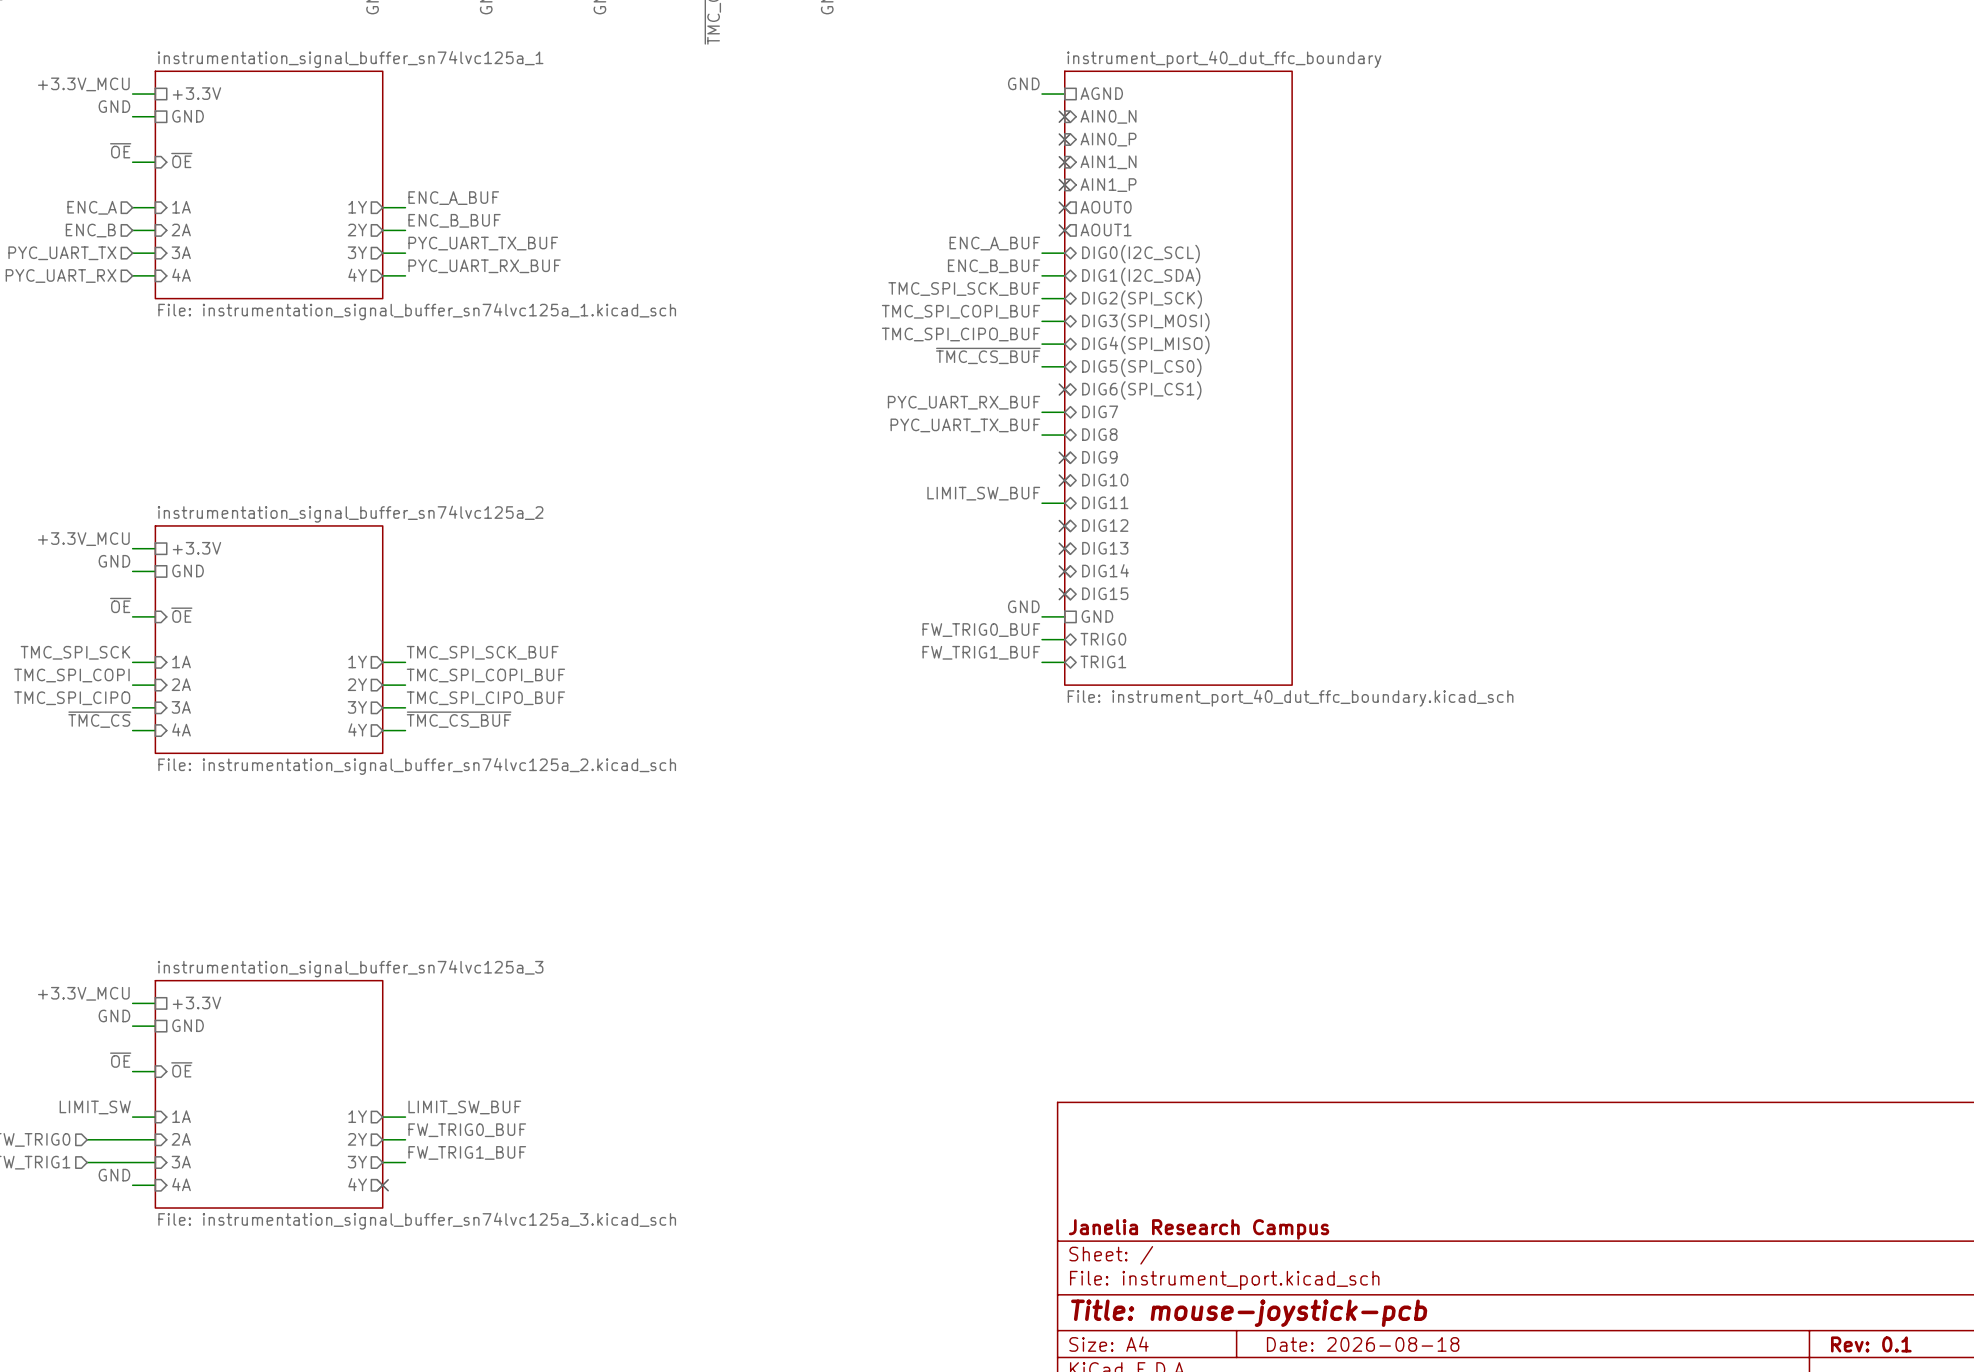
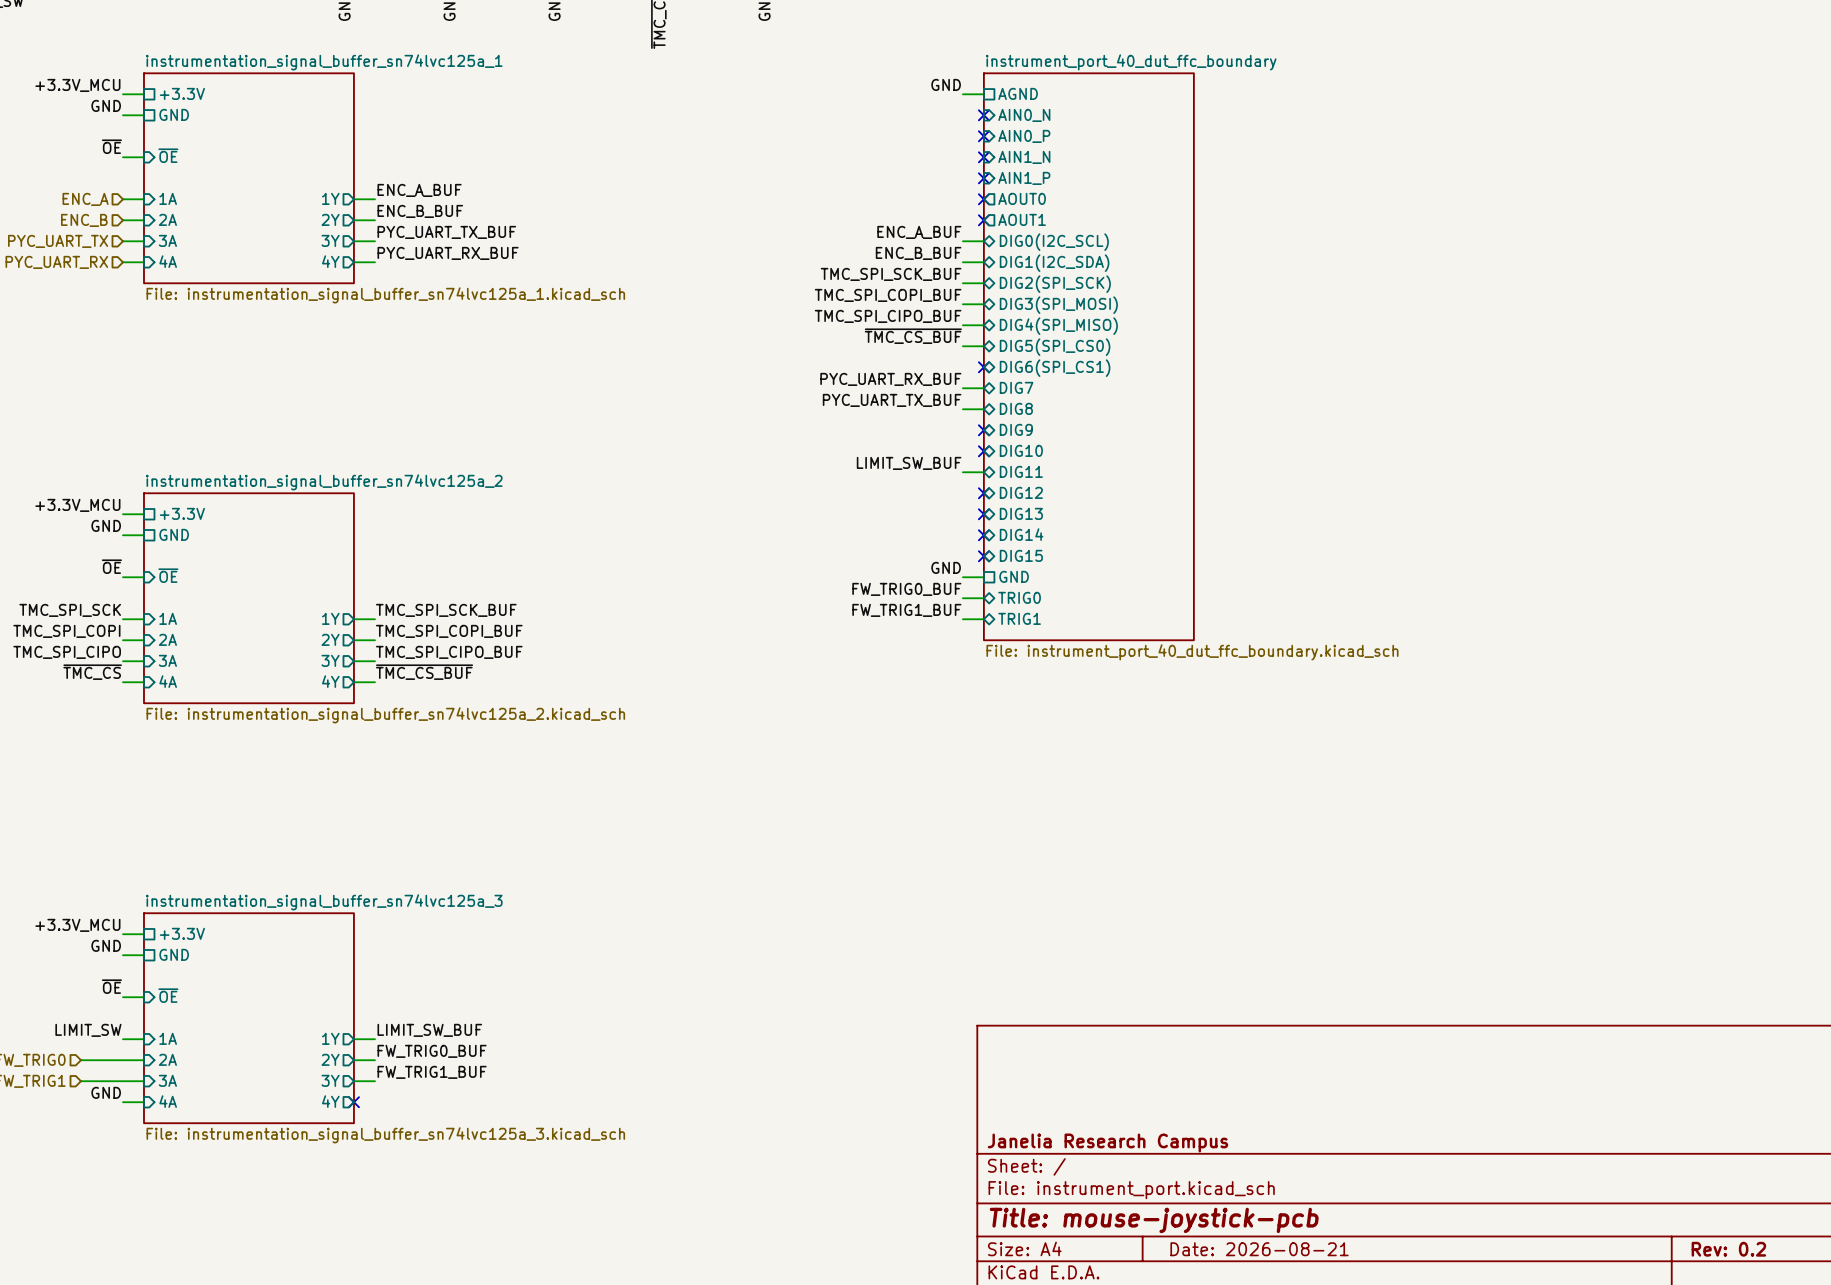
title block: Date: 2026-08-18 (1363, 1344) -> Date: 2026-08-21 (1259, 1249)
title block: Rev: 0.1 (1871, 1344) -> Rev: 0.2 (1728, 1249)

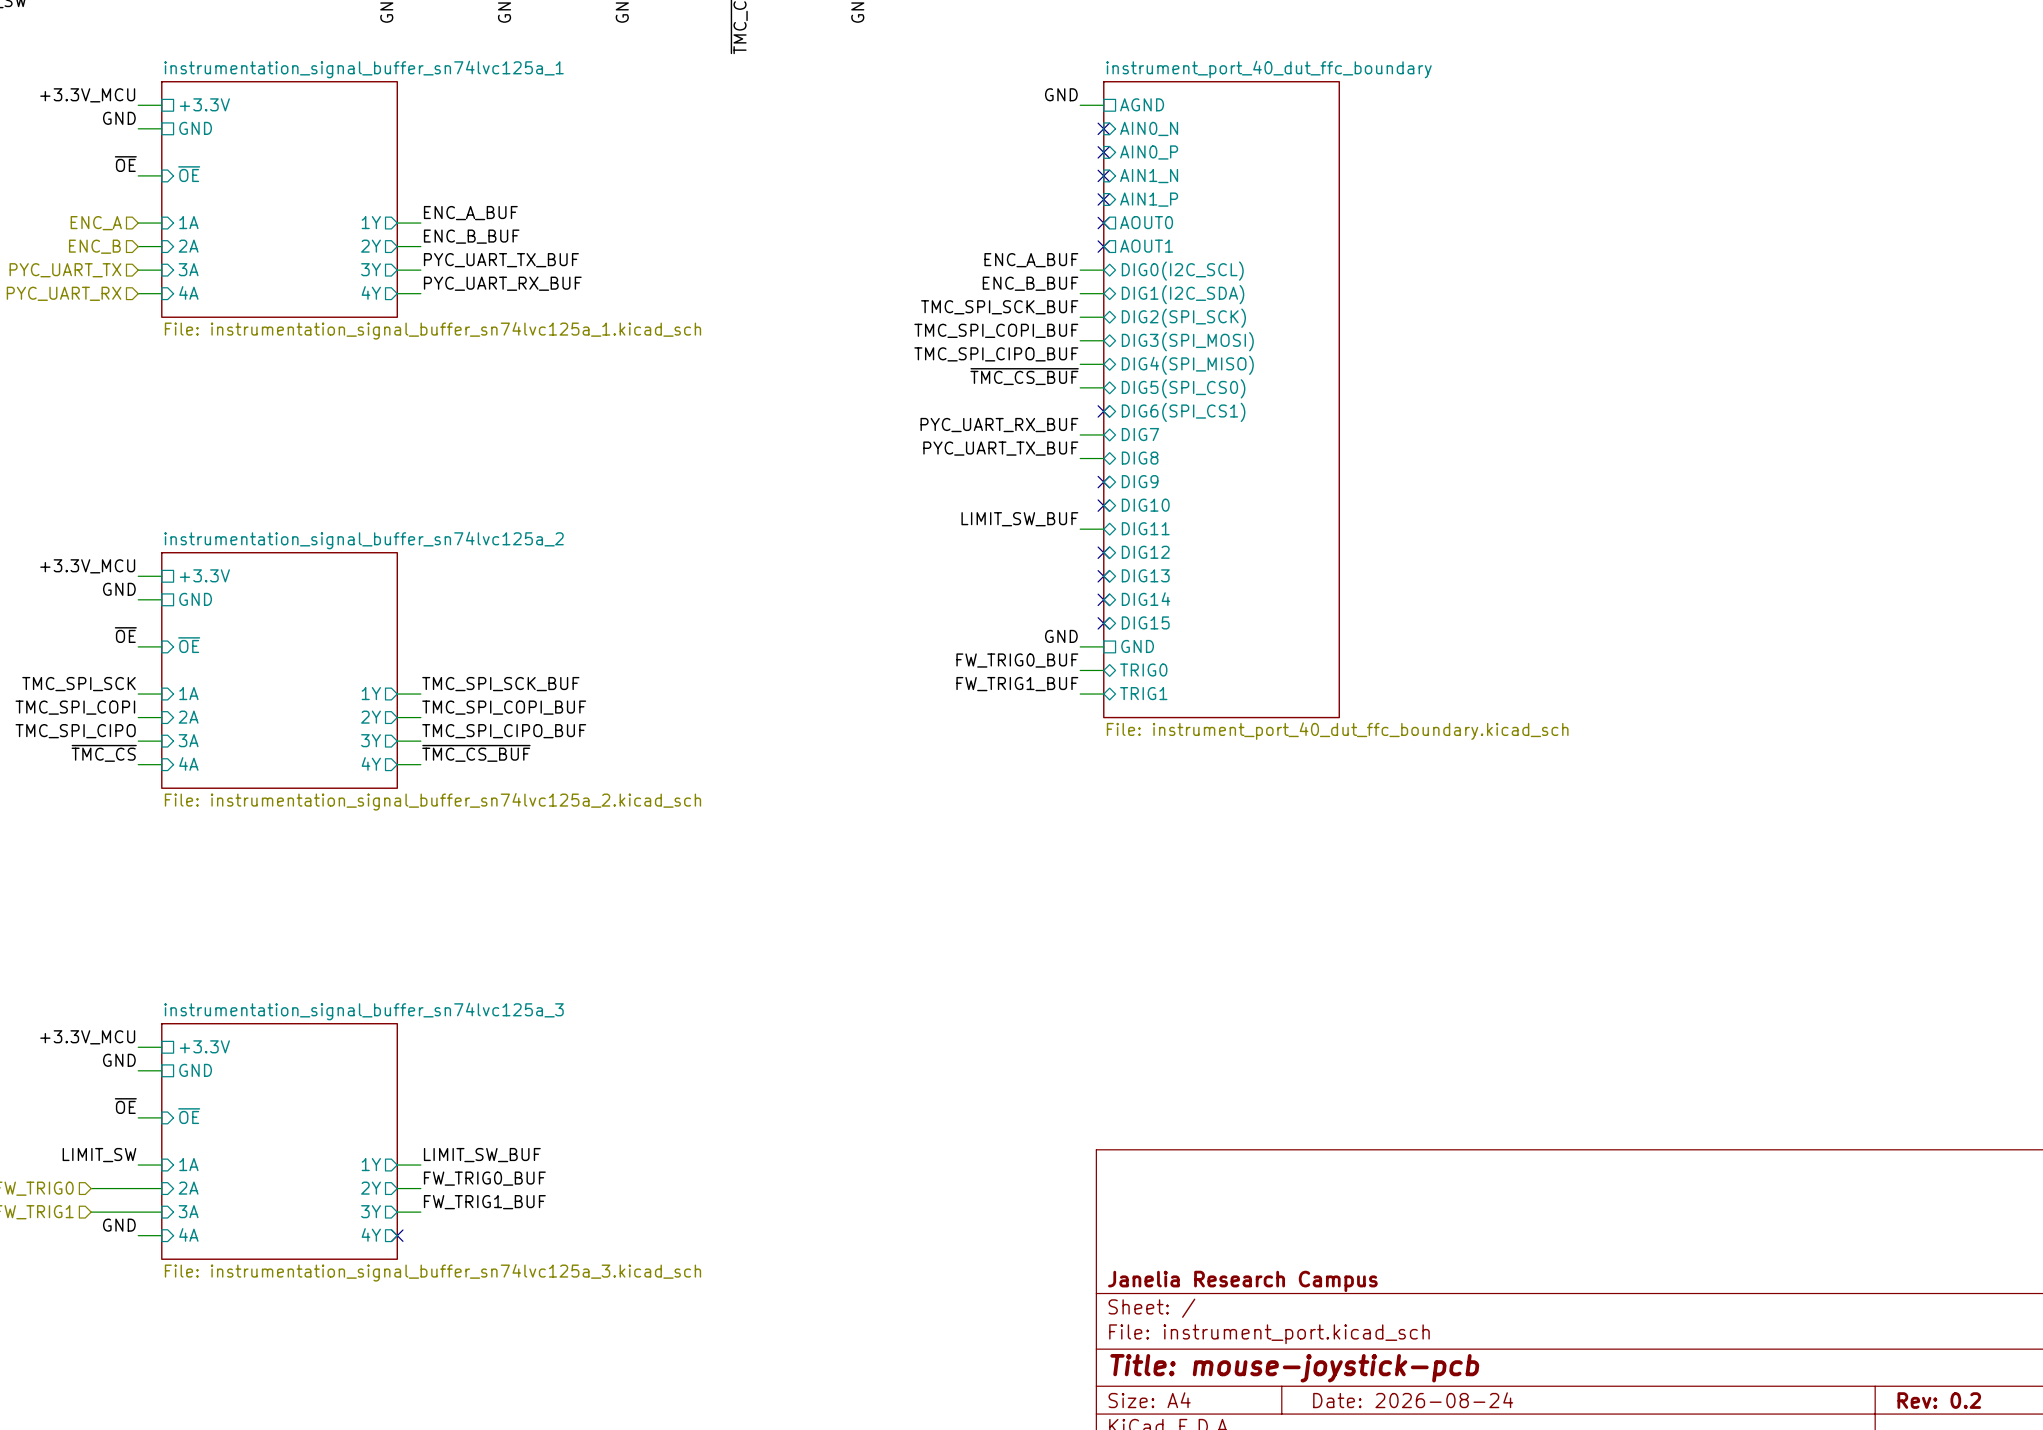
title block: Date: 2026-08-21 (1259, 1249) -> Date: 2026-08-24 (1413, 1400)

